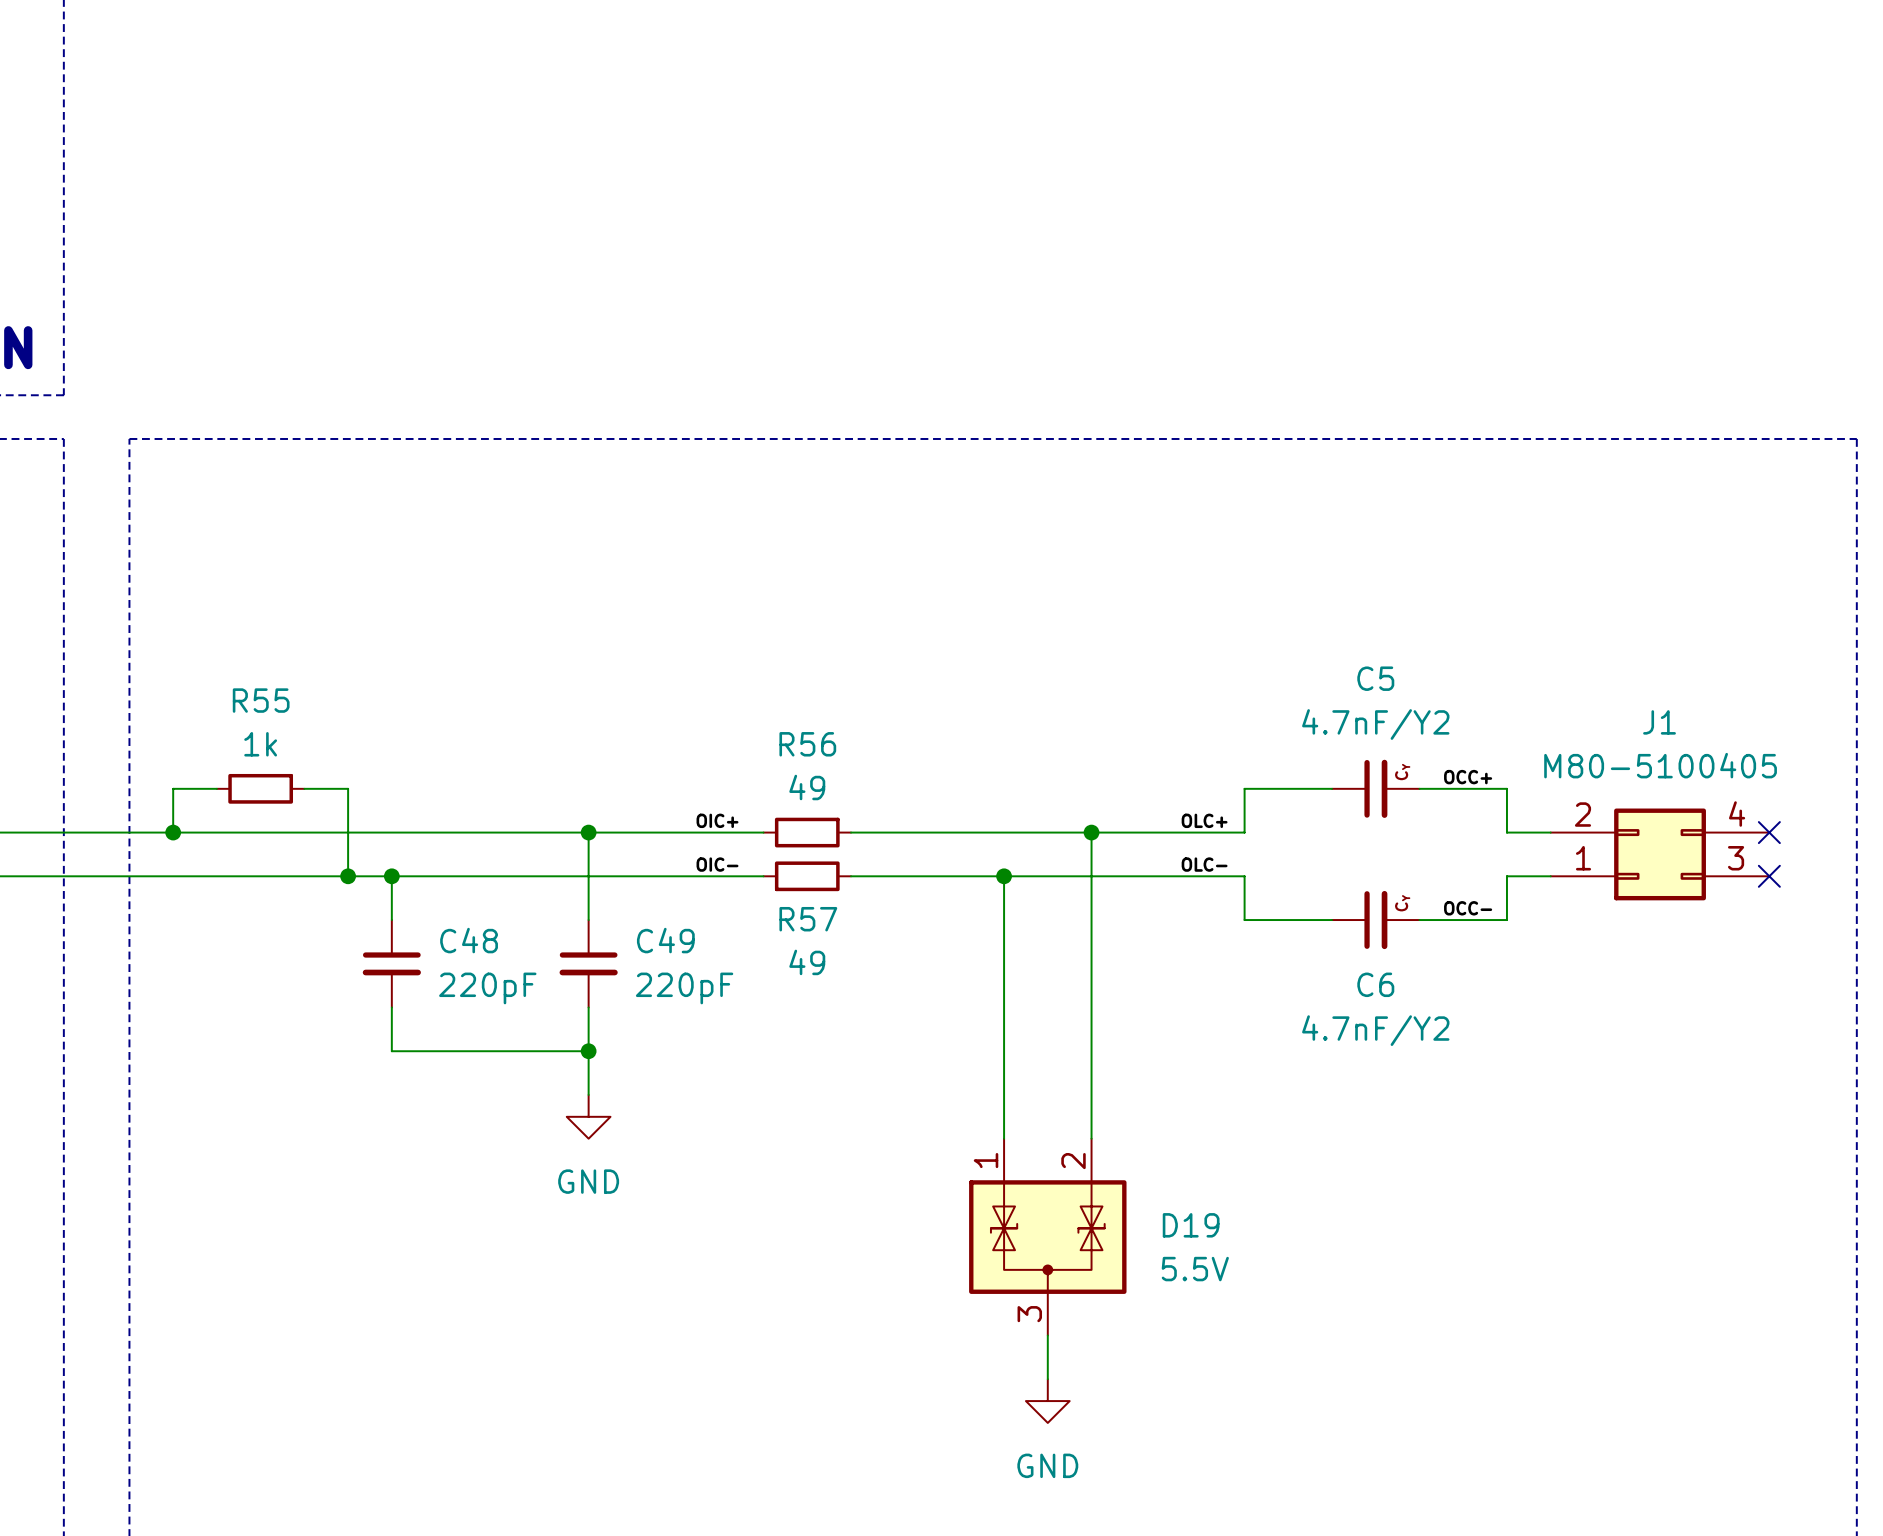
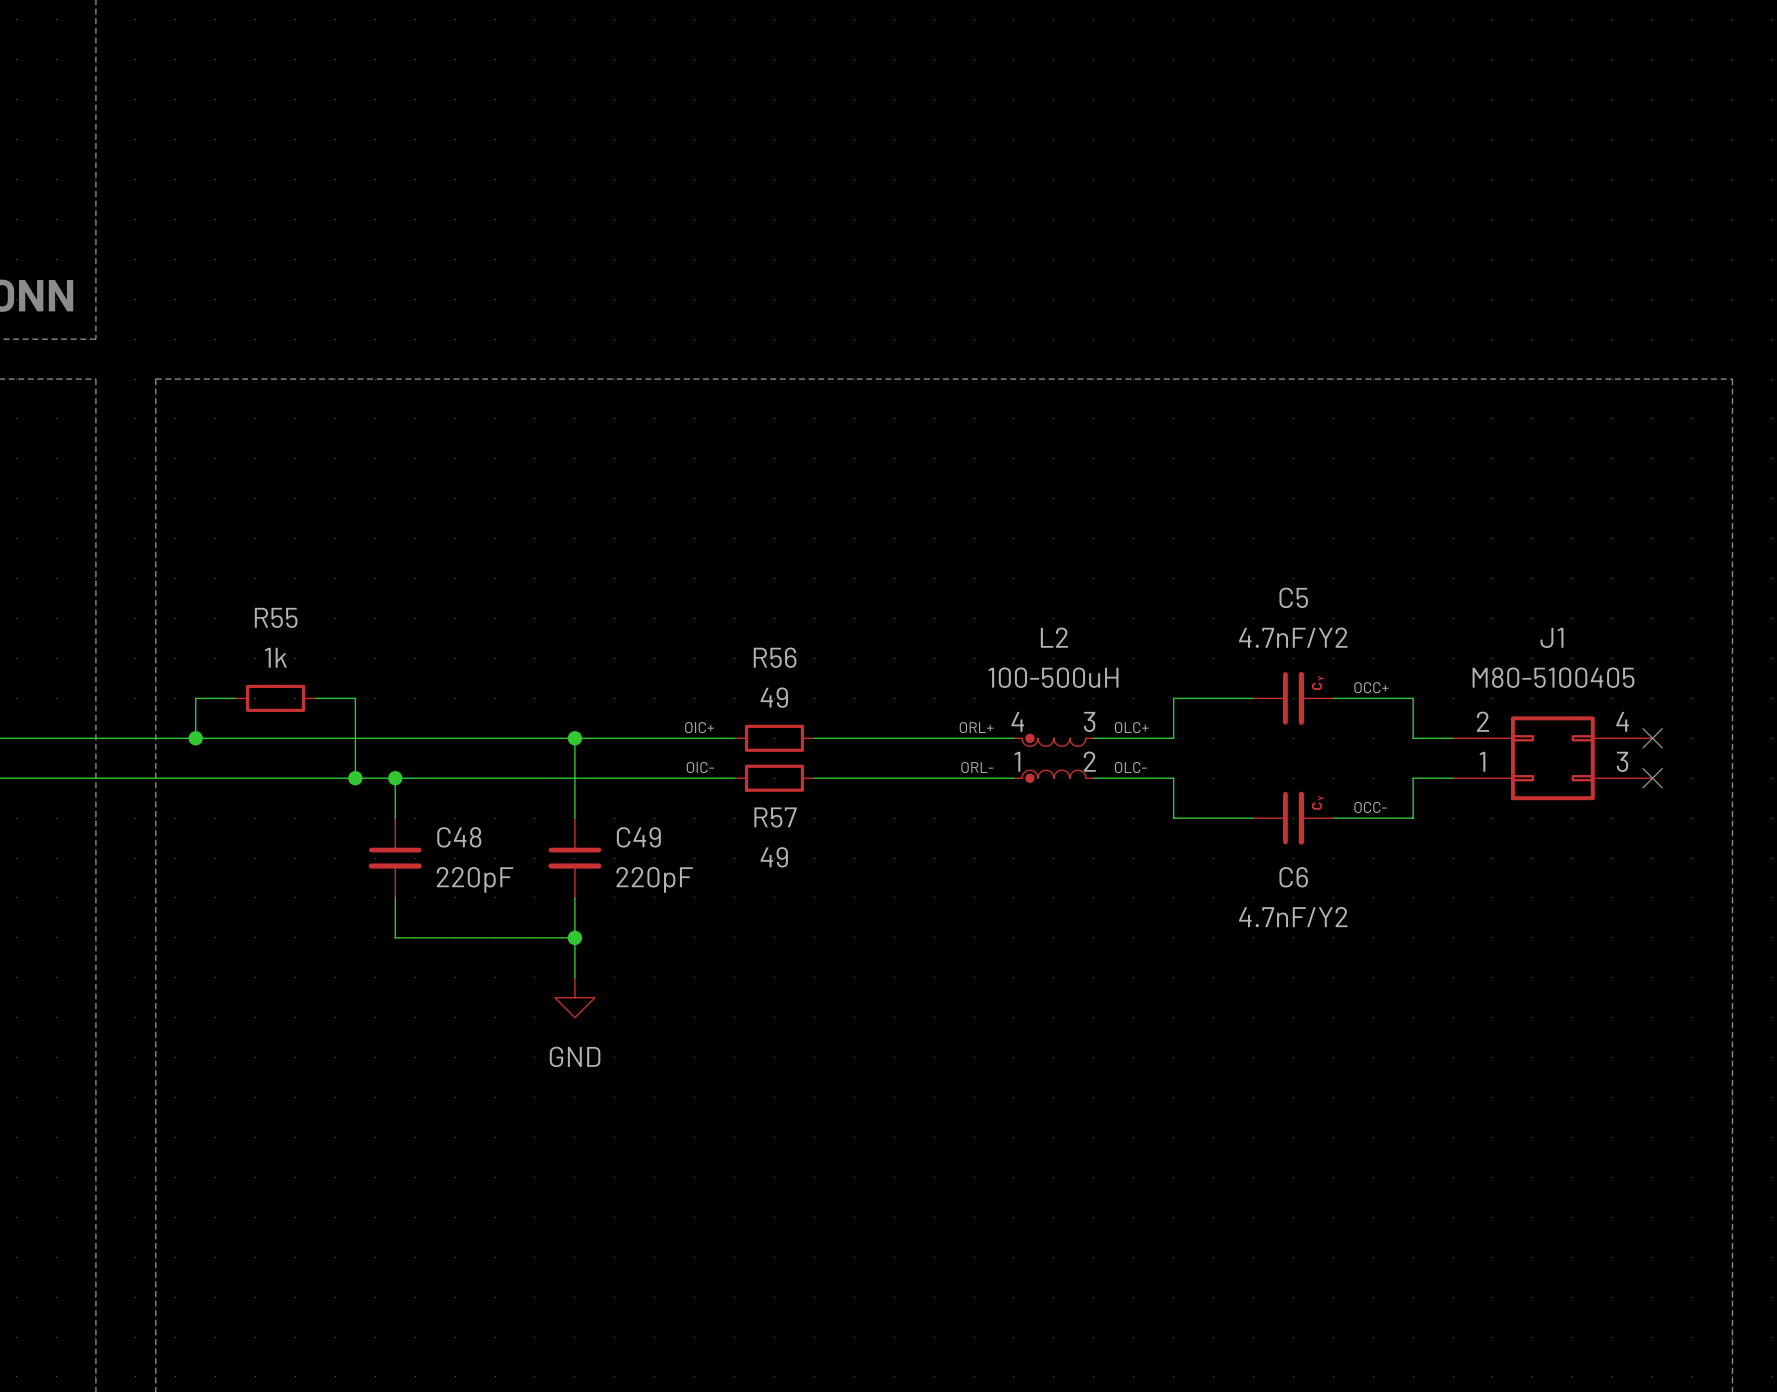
label: none -> ORL+ (976, 727)
wire: (1069, 832) (1157, 832) -> none
wire: (1091, 832) (1091, 1138) -> none
junction: (1091, 832) -> none
L2: none -> 100-500uH (1053, 758)
label: none -> ORL- (977, 767)
wire: (1004, 876) (1004, 1138) -> none
junction: (1004, 876) -> none
wire: (1069, 876) (1157, 876) -> none
D19: 5.5V (1047, 1237) -> none
wire: (1047, 1335) (1047, 1379) -> none
power symbol: GND (1047, 1401) -> none

